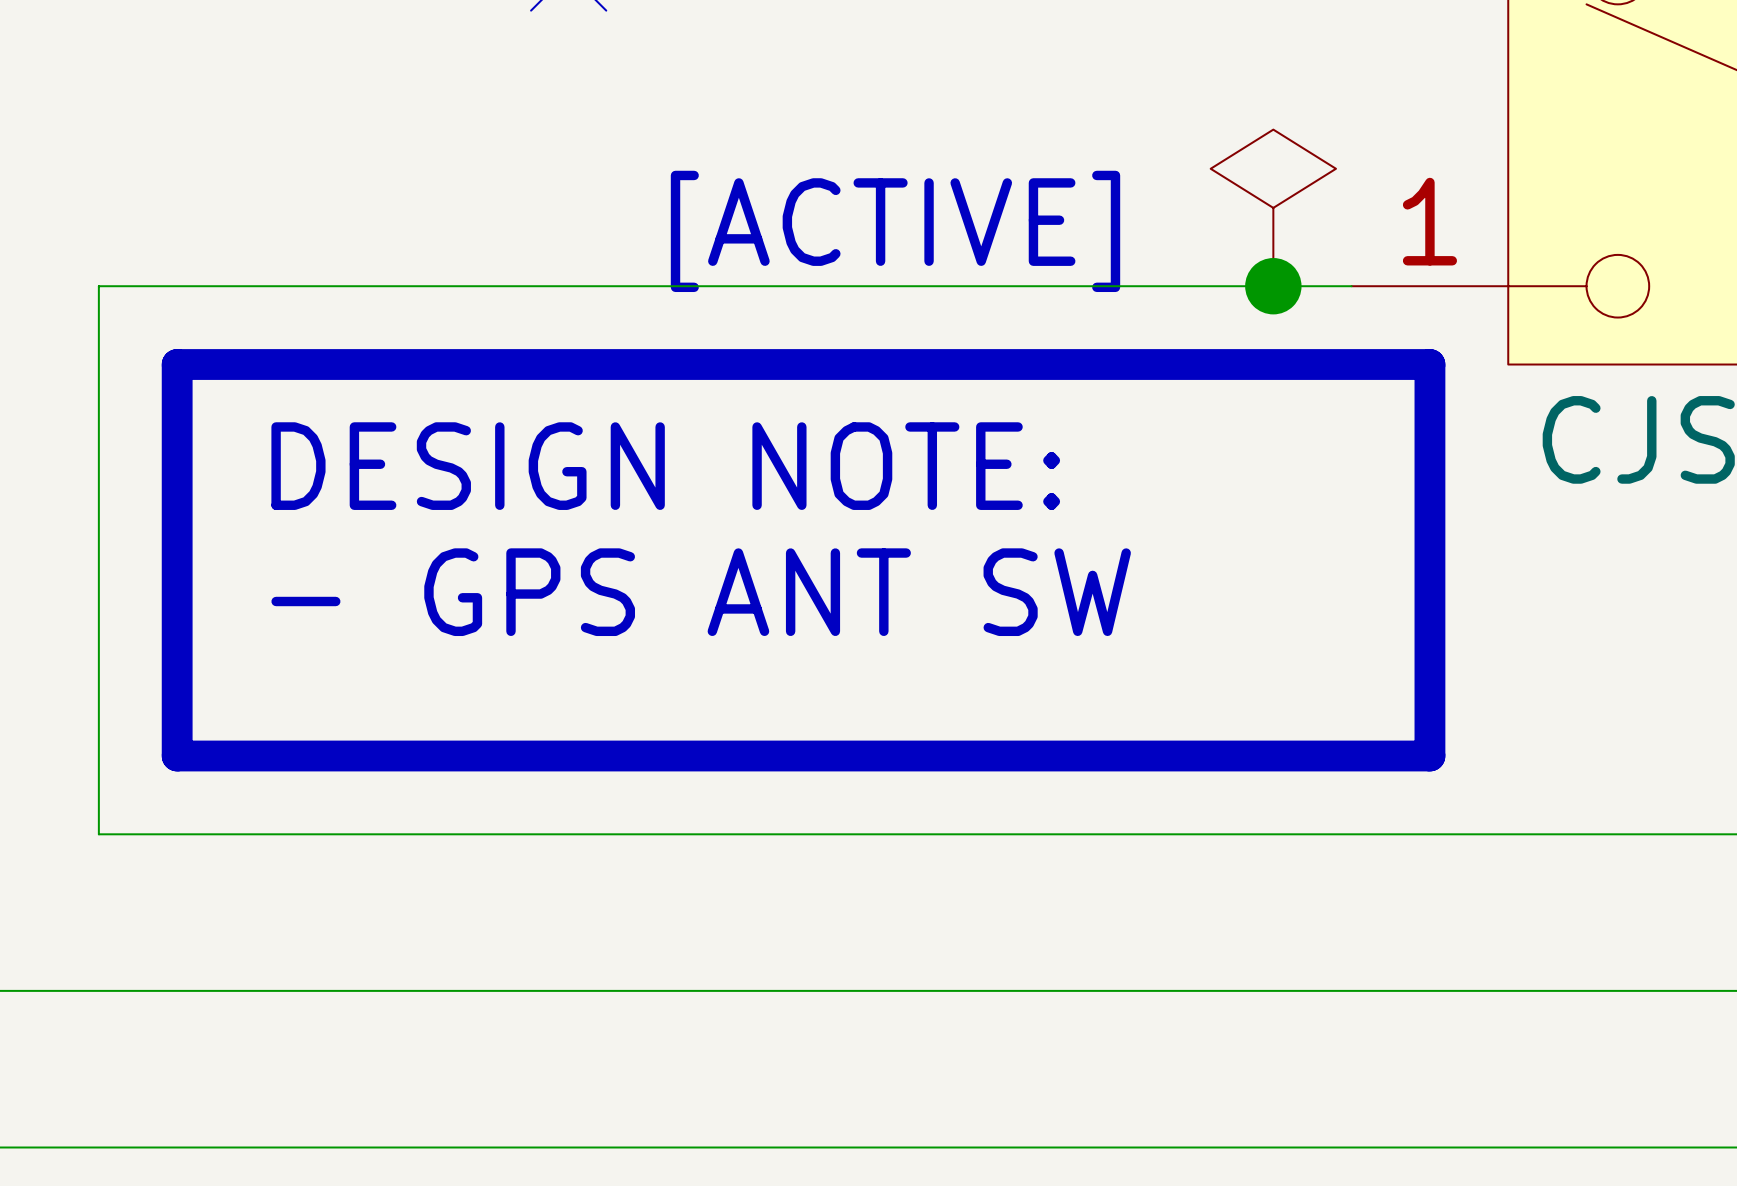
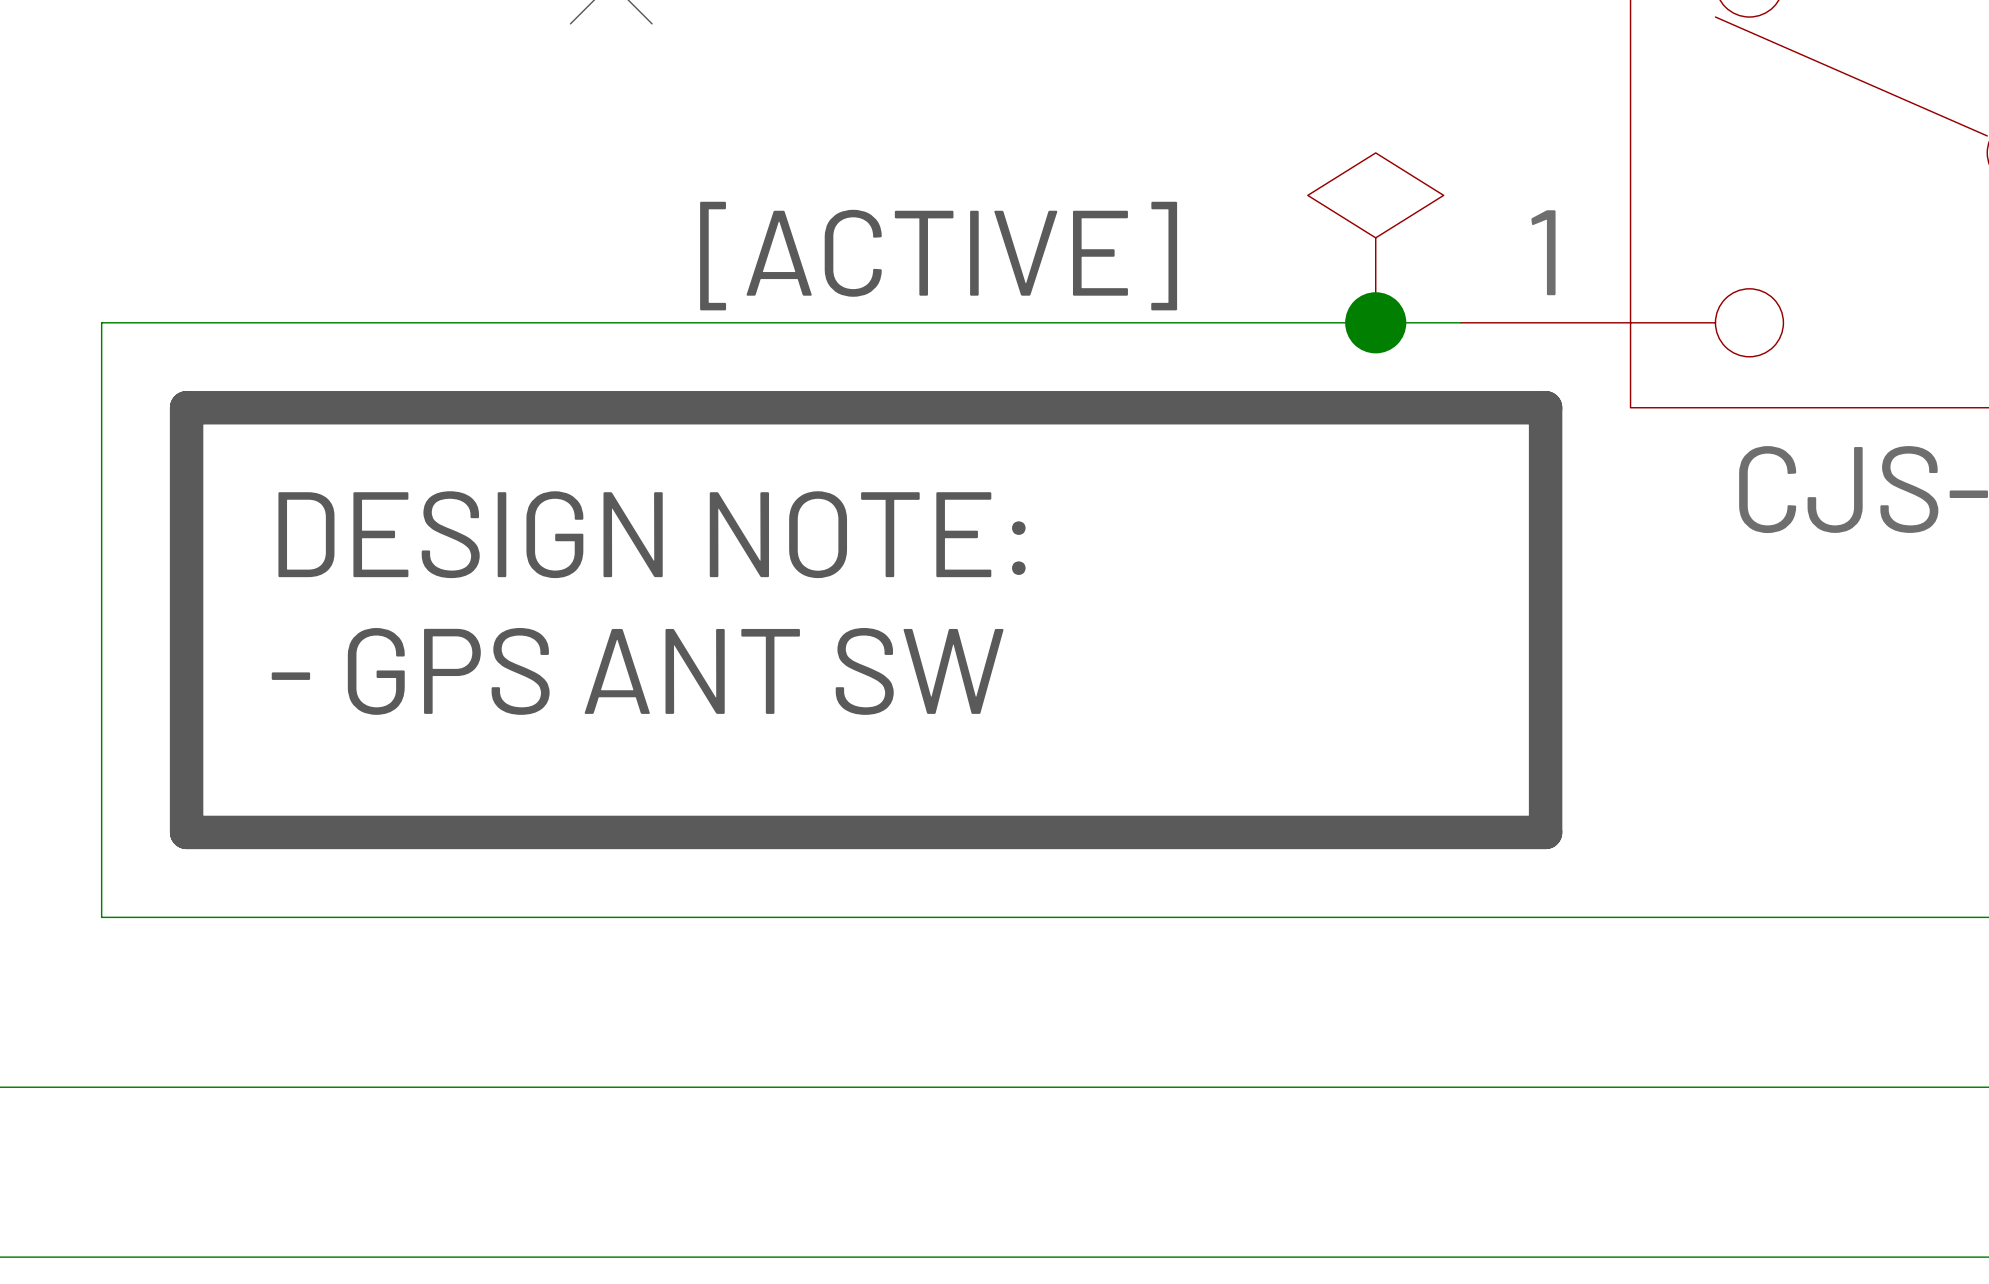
text position: DESIGN NOTE: (665, 466) -> DESIGN NOTE: (652, 534)
text position: - GPS ANT SW (701, 592) -> - GPS ANT SW (637, 671)

